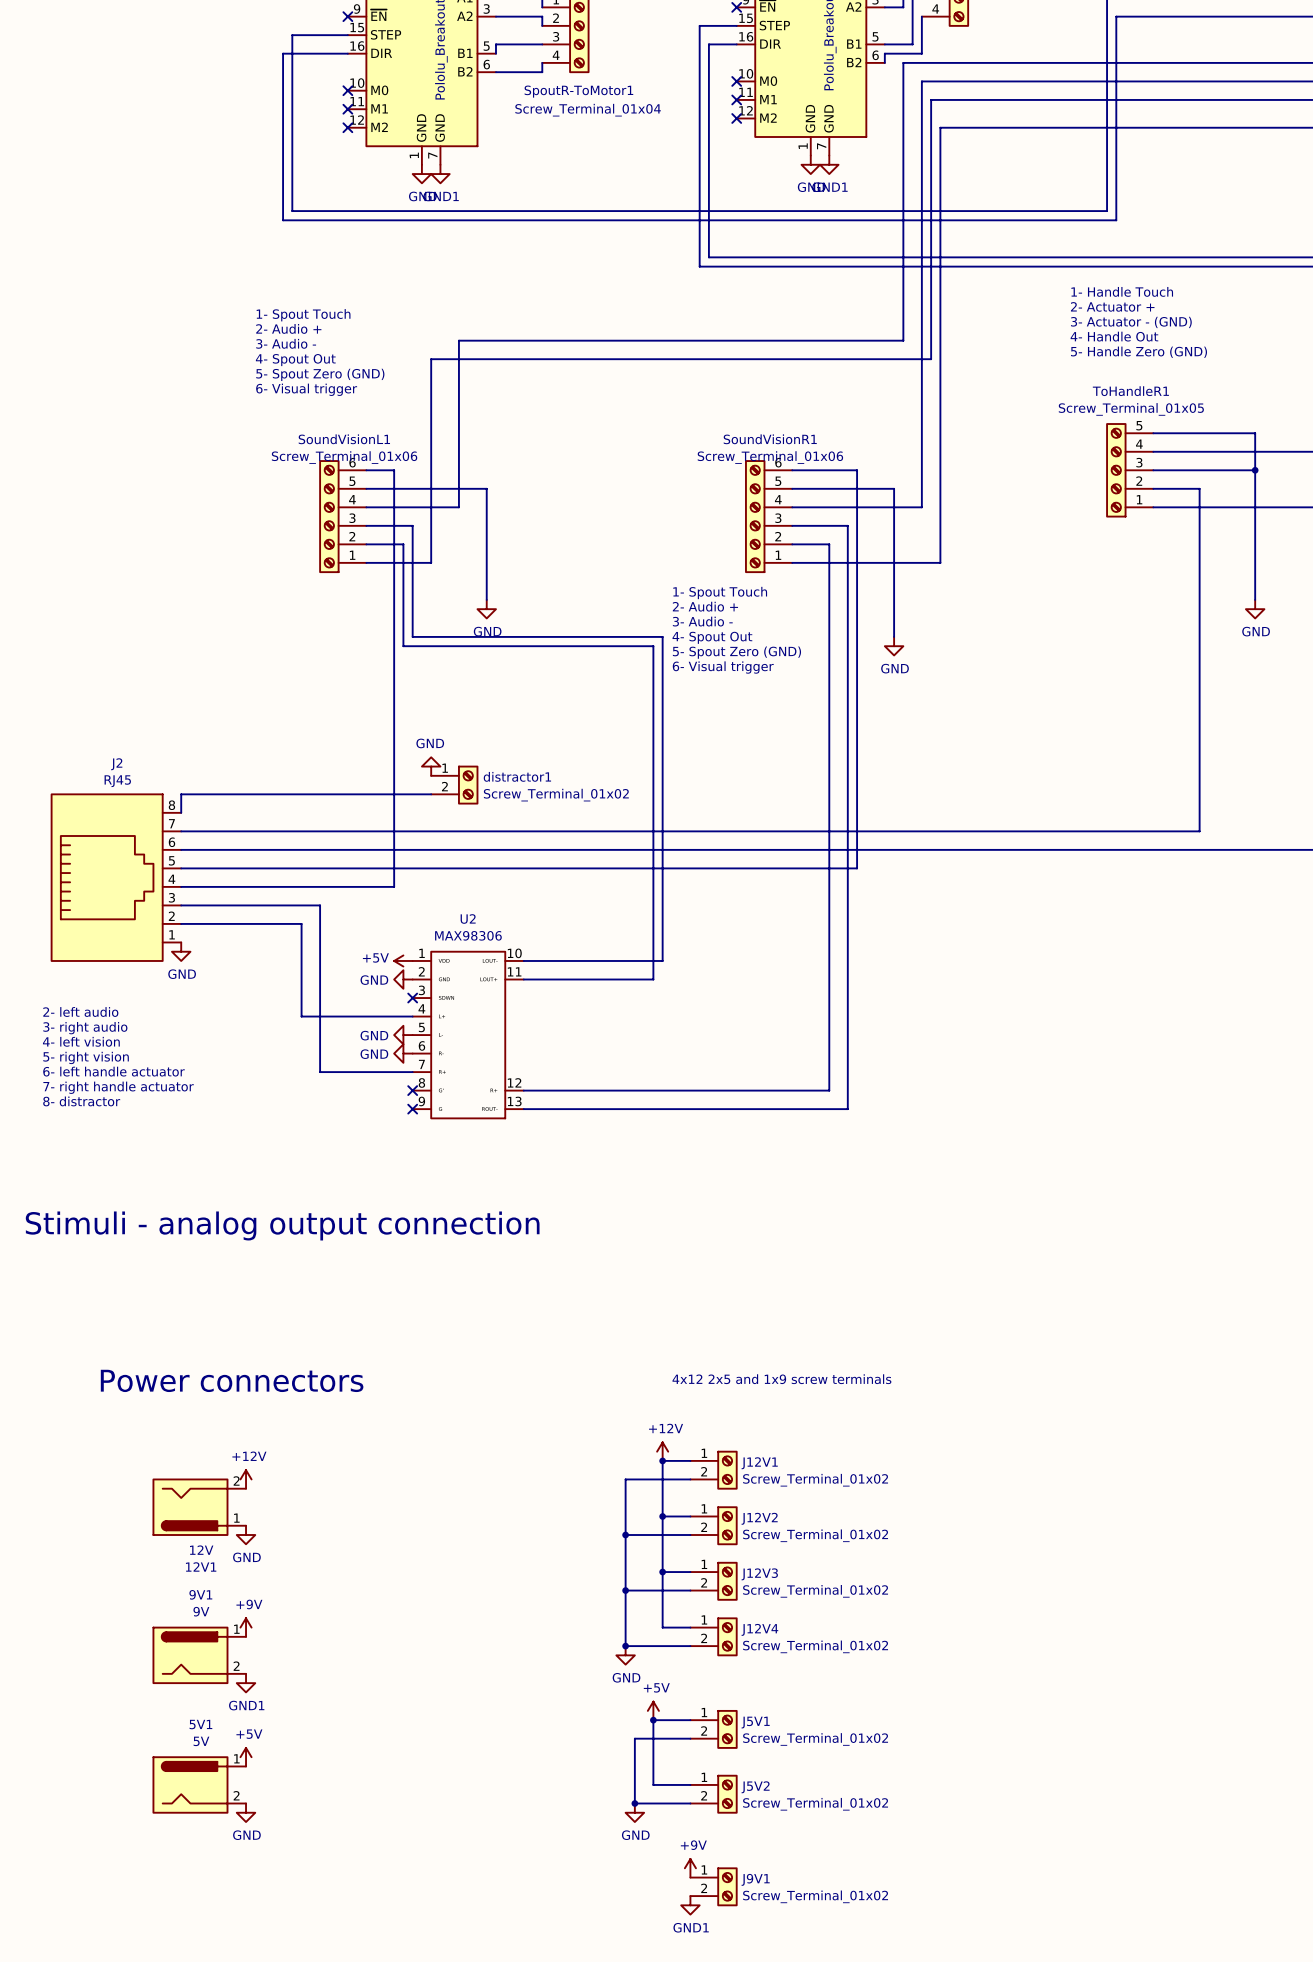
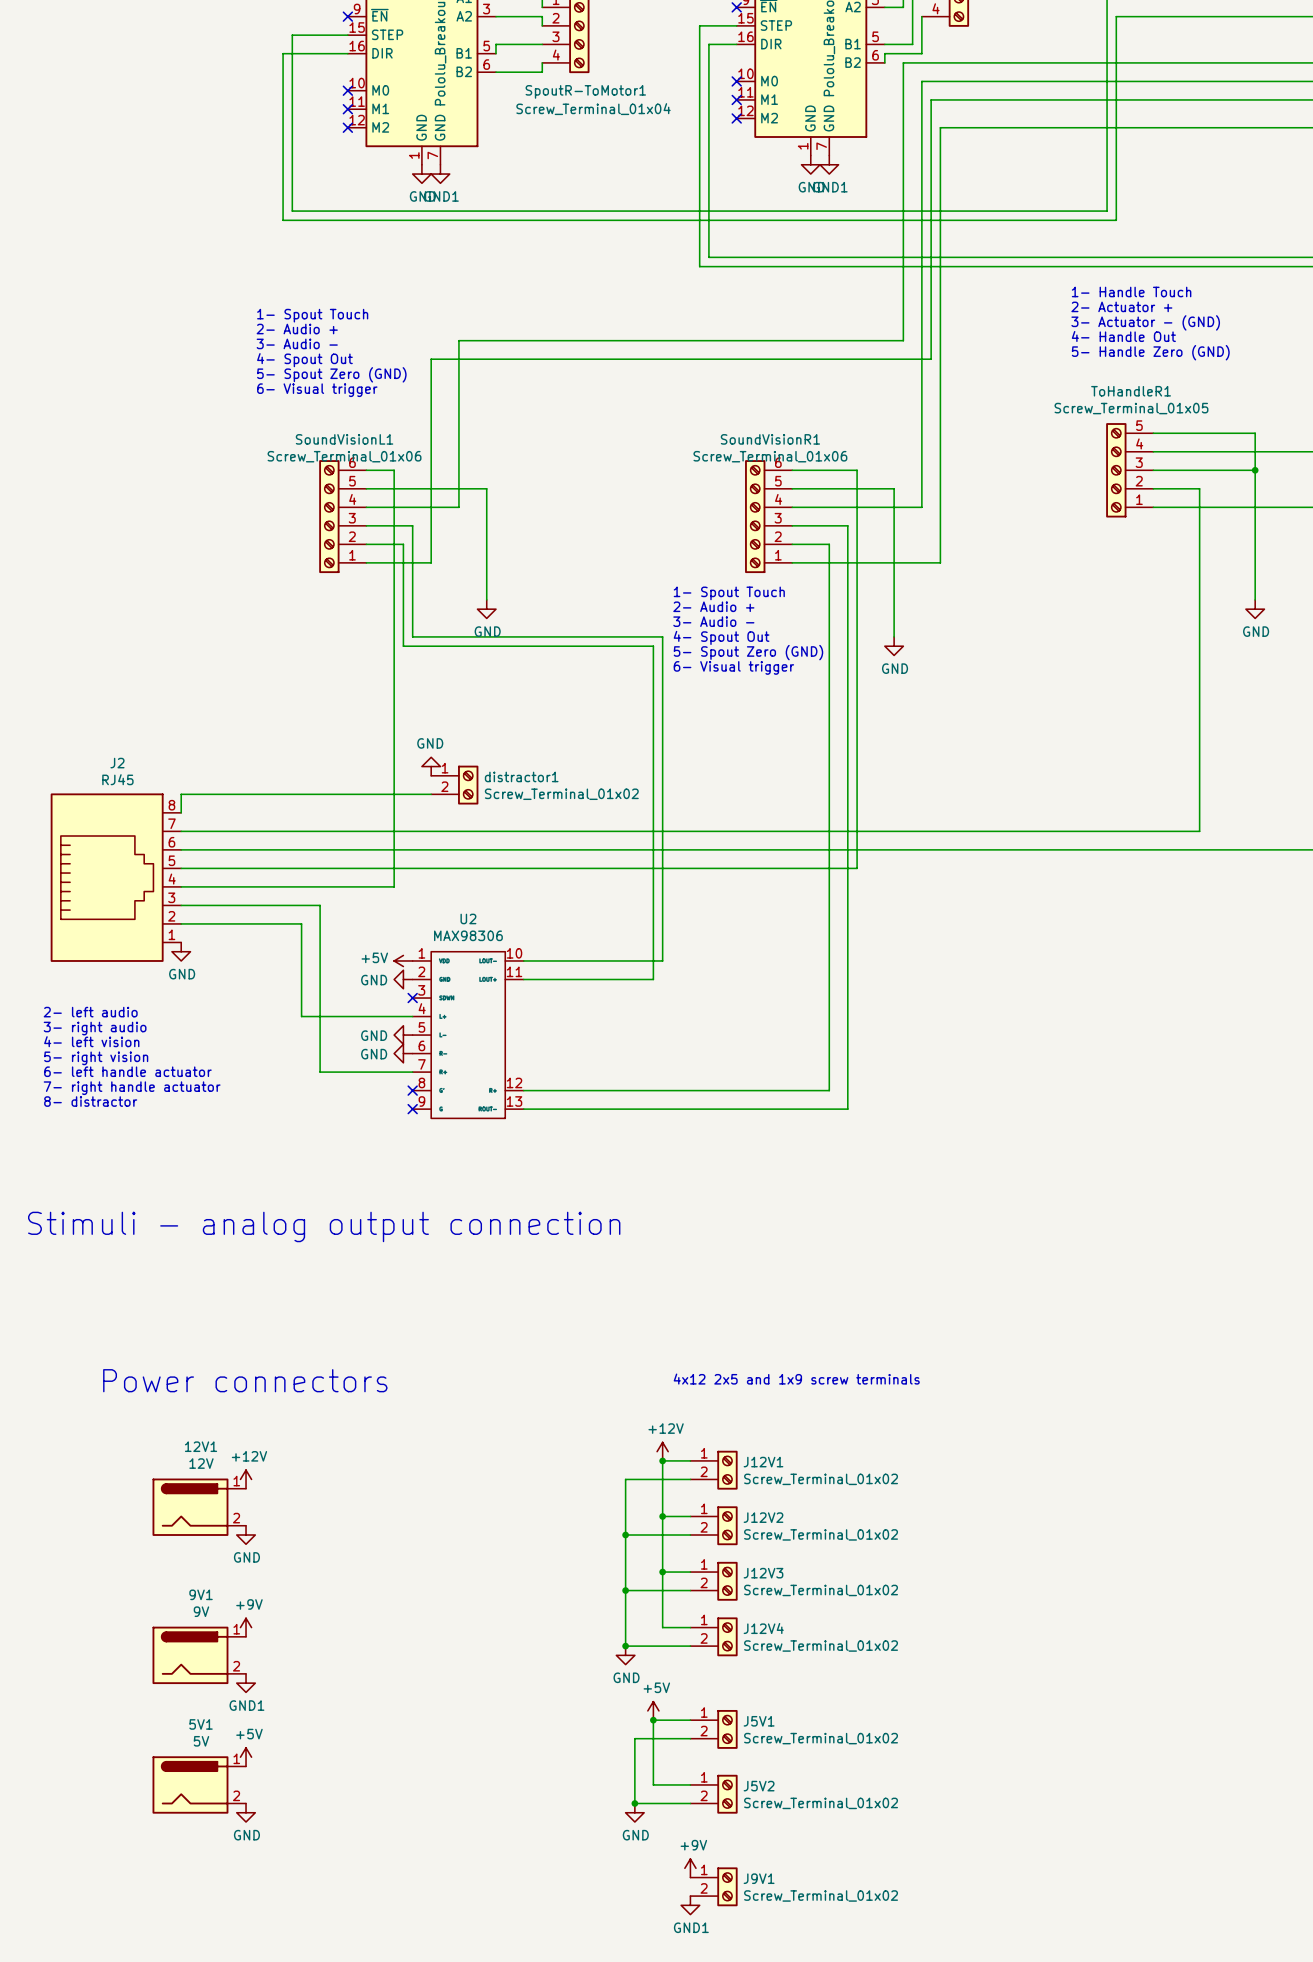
12V1 flip: as is (190, 1507) -> up-down (190, 1507)

